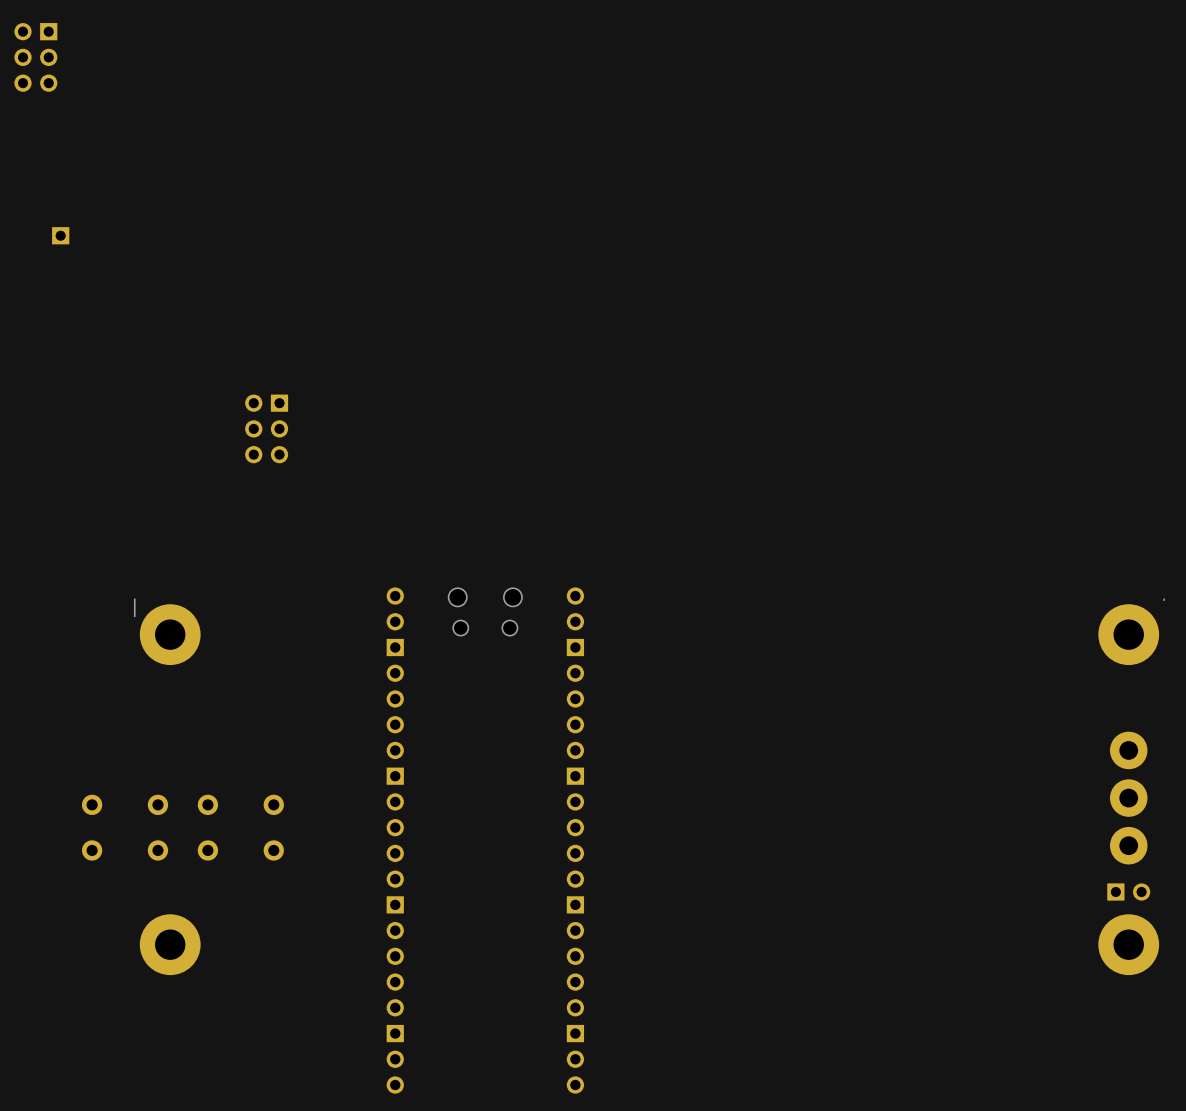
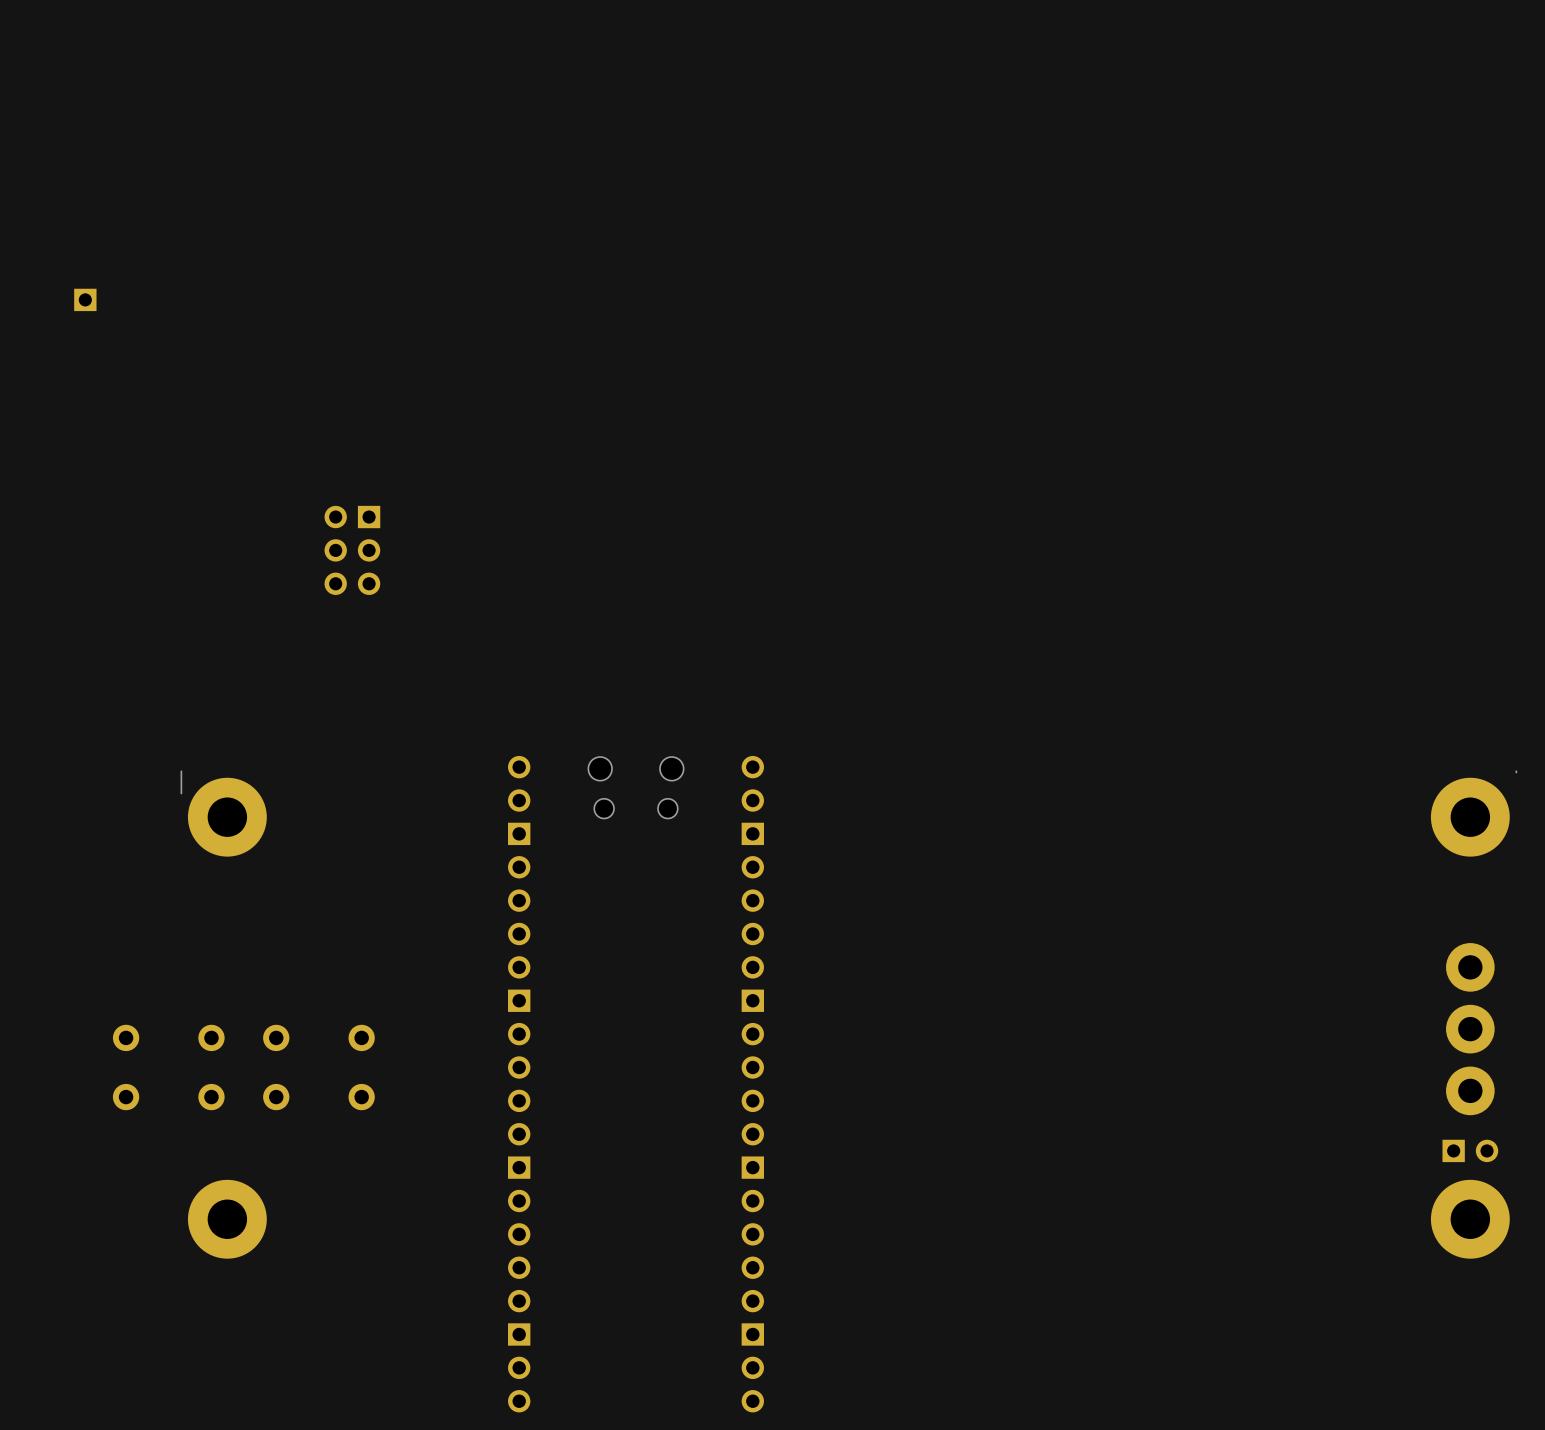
part: (35, 57) -> none

